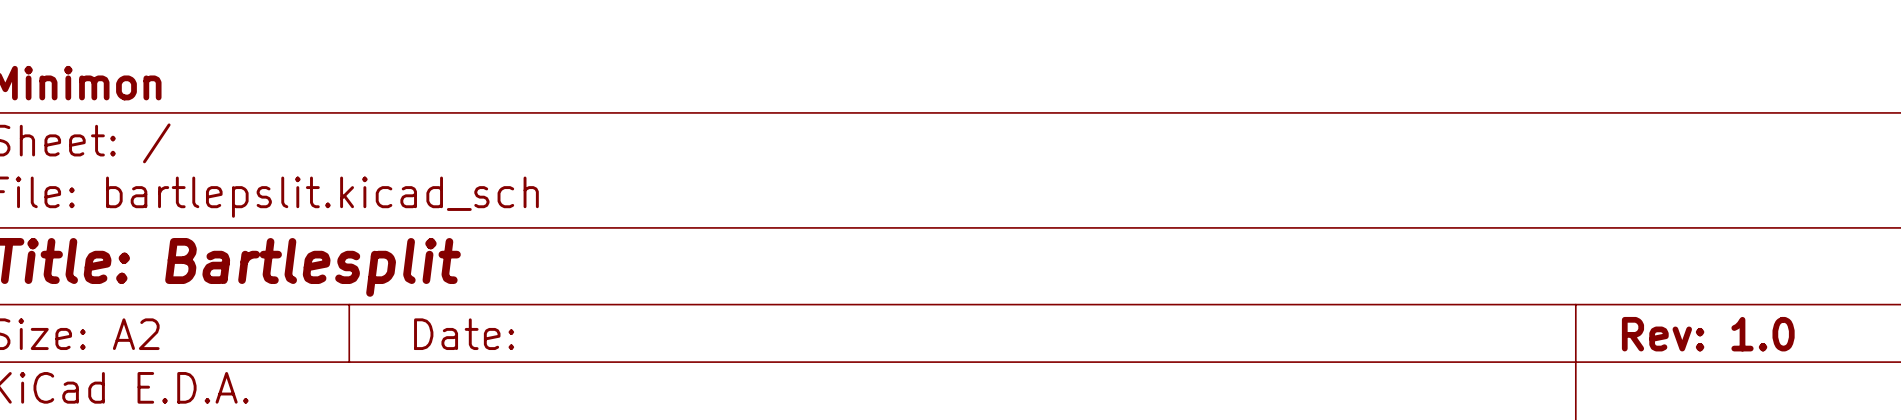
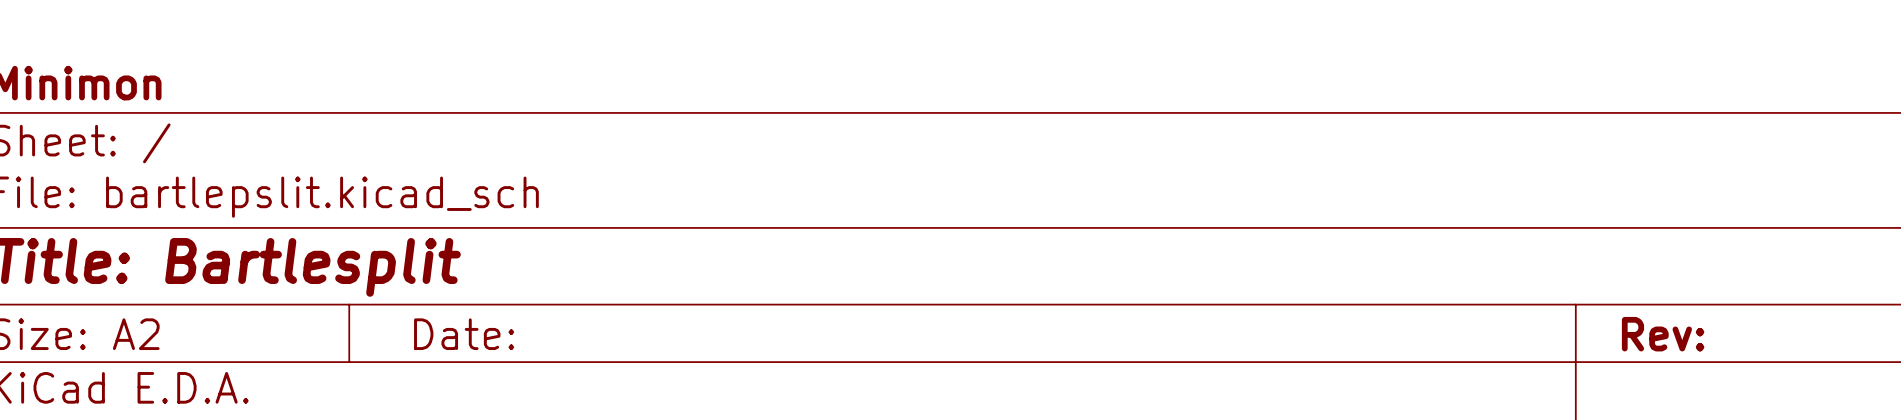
title block: Rev: 1.0 (1708, 334) -> Rev: (1663, 334)

